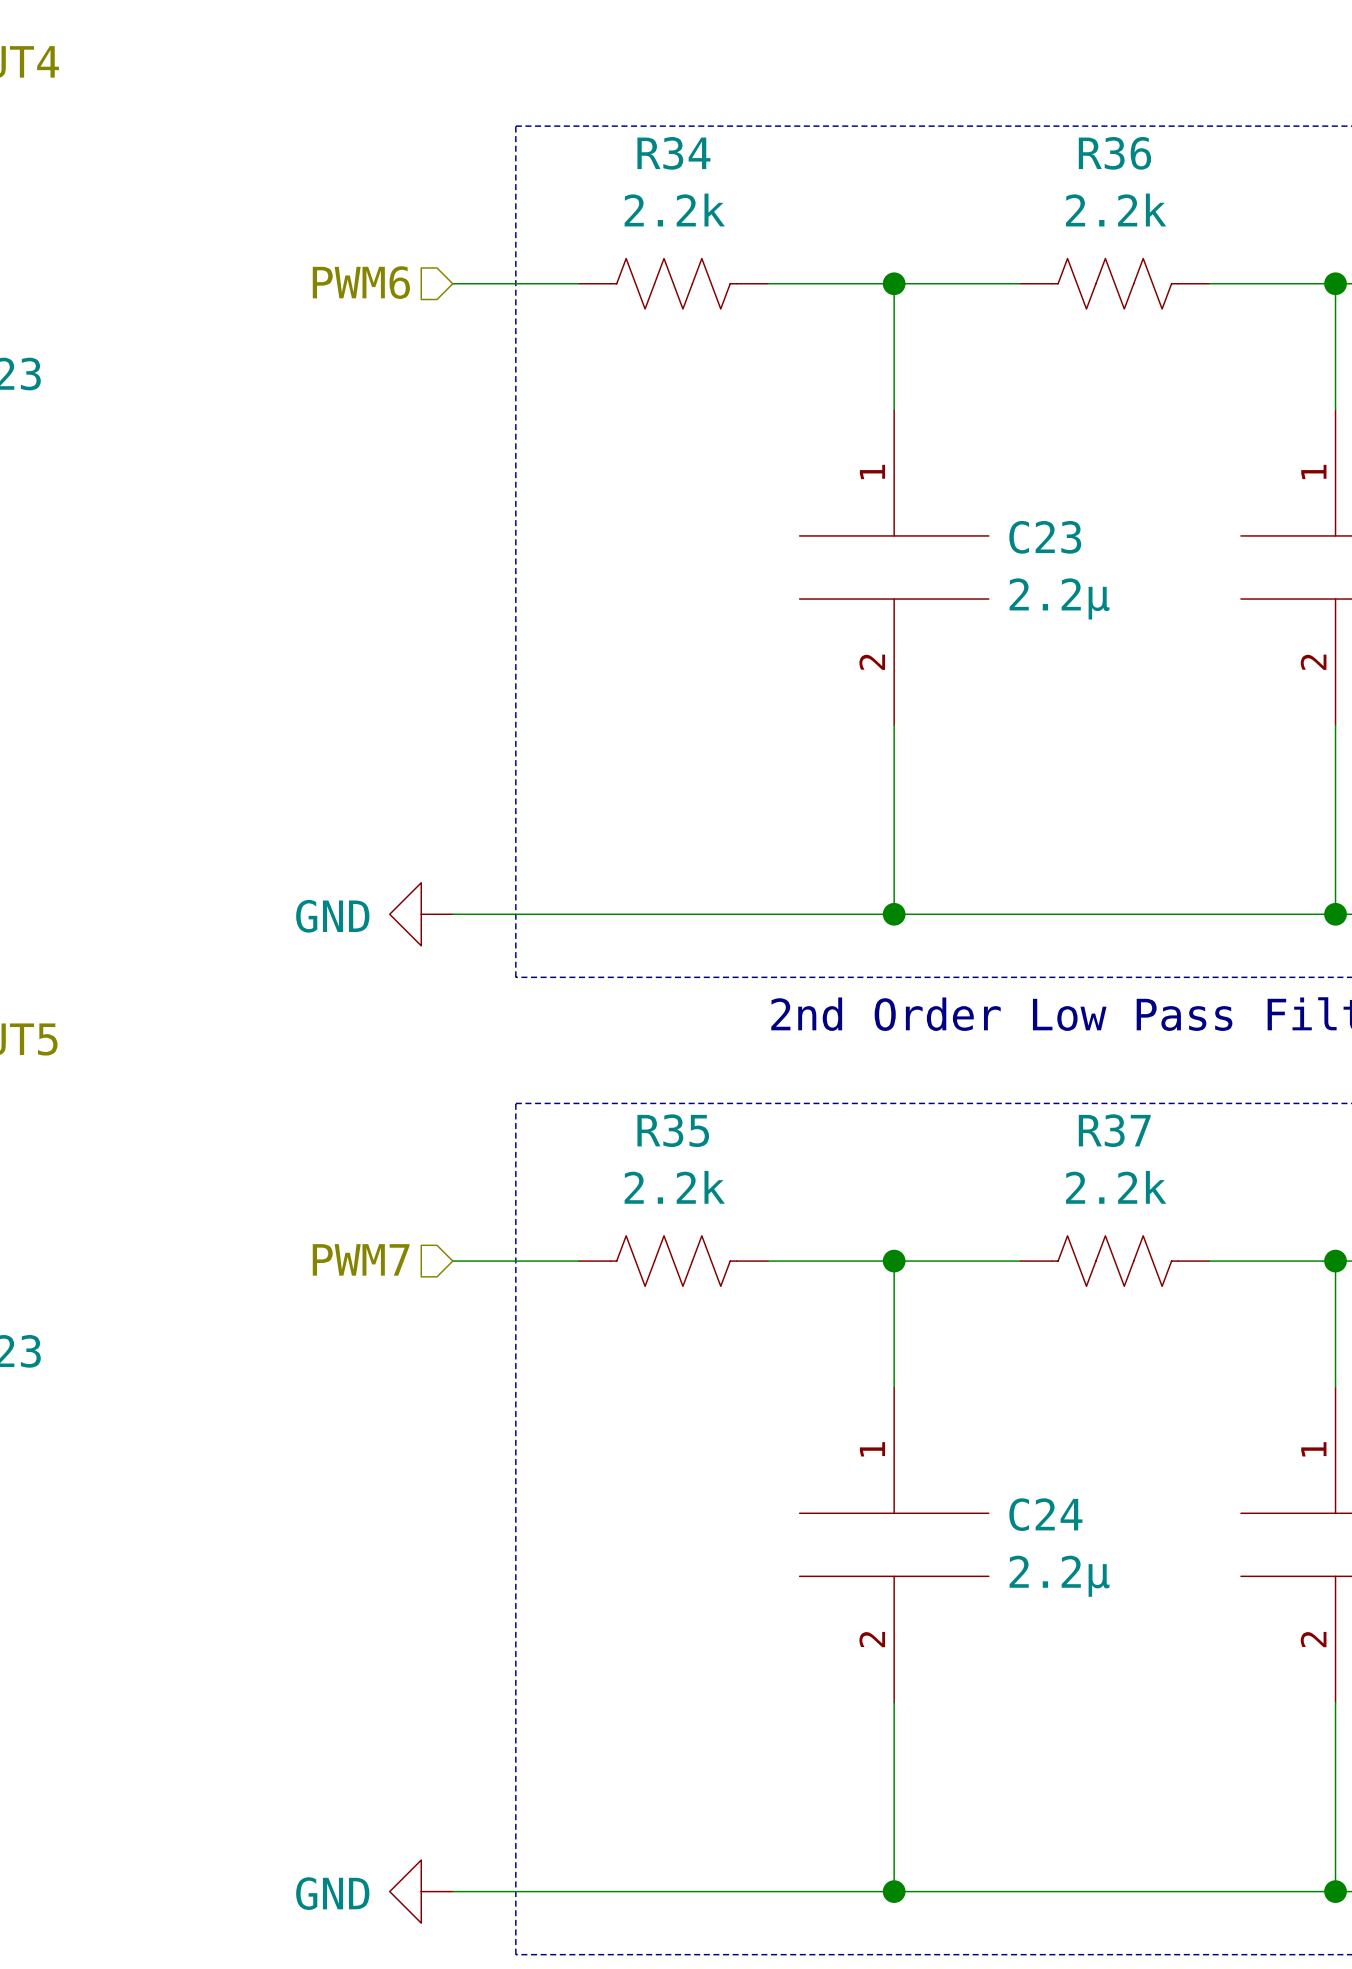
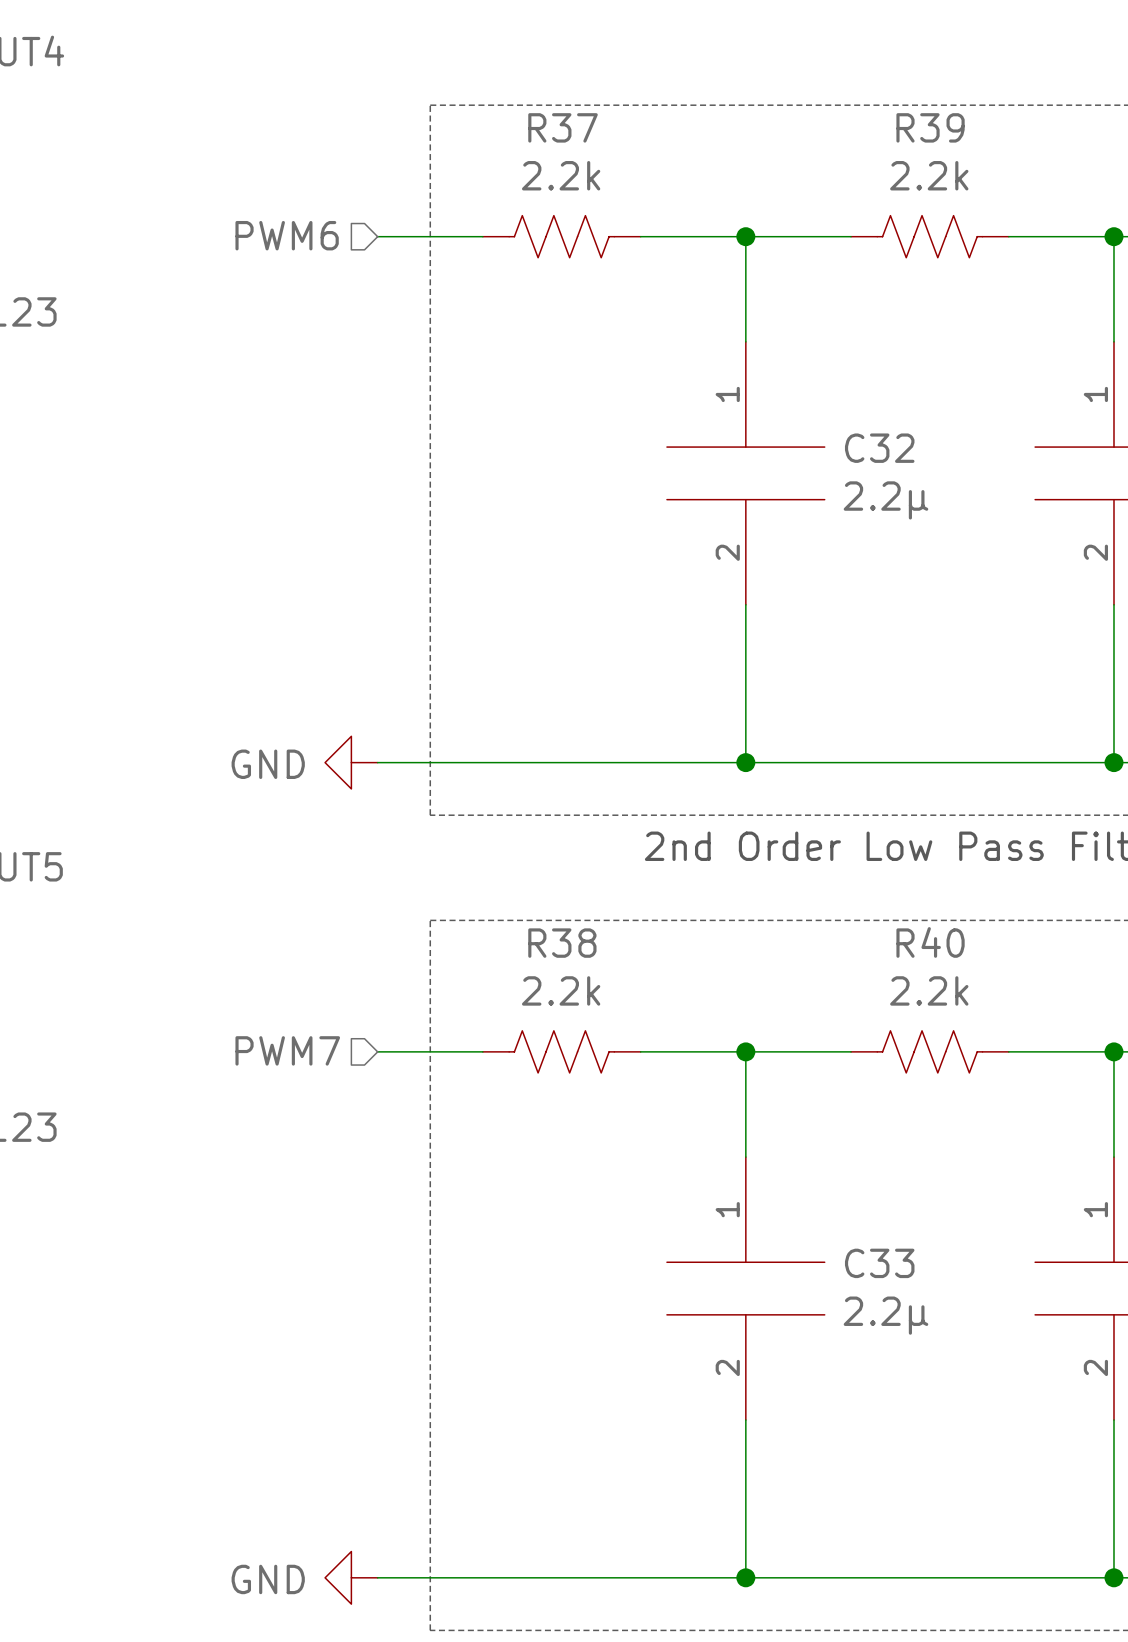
R34 name: R34 (673, 153) -> R37 (563, 127)
R36 name: R36 (1114, 153) -> R39 (930, 127)
C23 name: C23 (1045, 537) -> C32 (879, 448)
R35 name: R35 (673, 1130) -> R38 (562, 943)
R37 name: R37 (1114, 1130) -> R40 (930, 942)
C24 name: C24 (1045, 1514) -> C33 (879, 1263)

